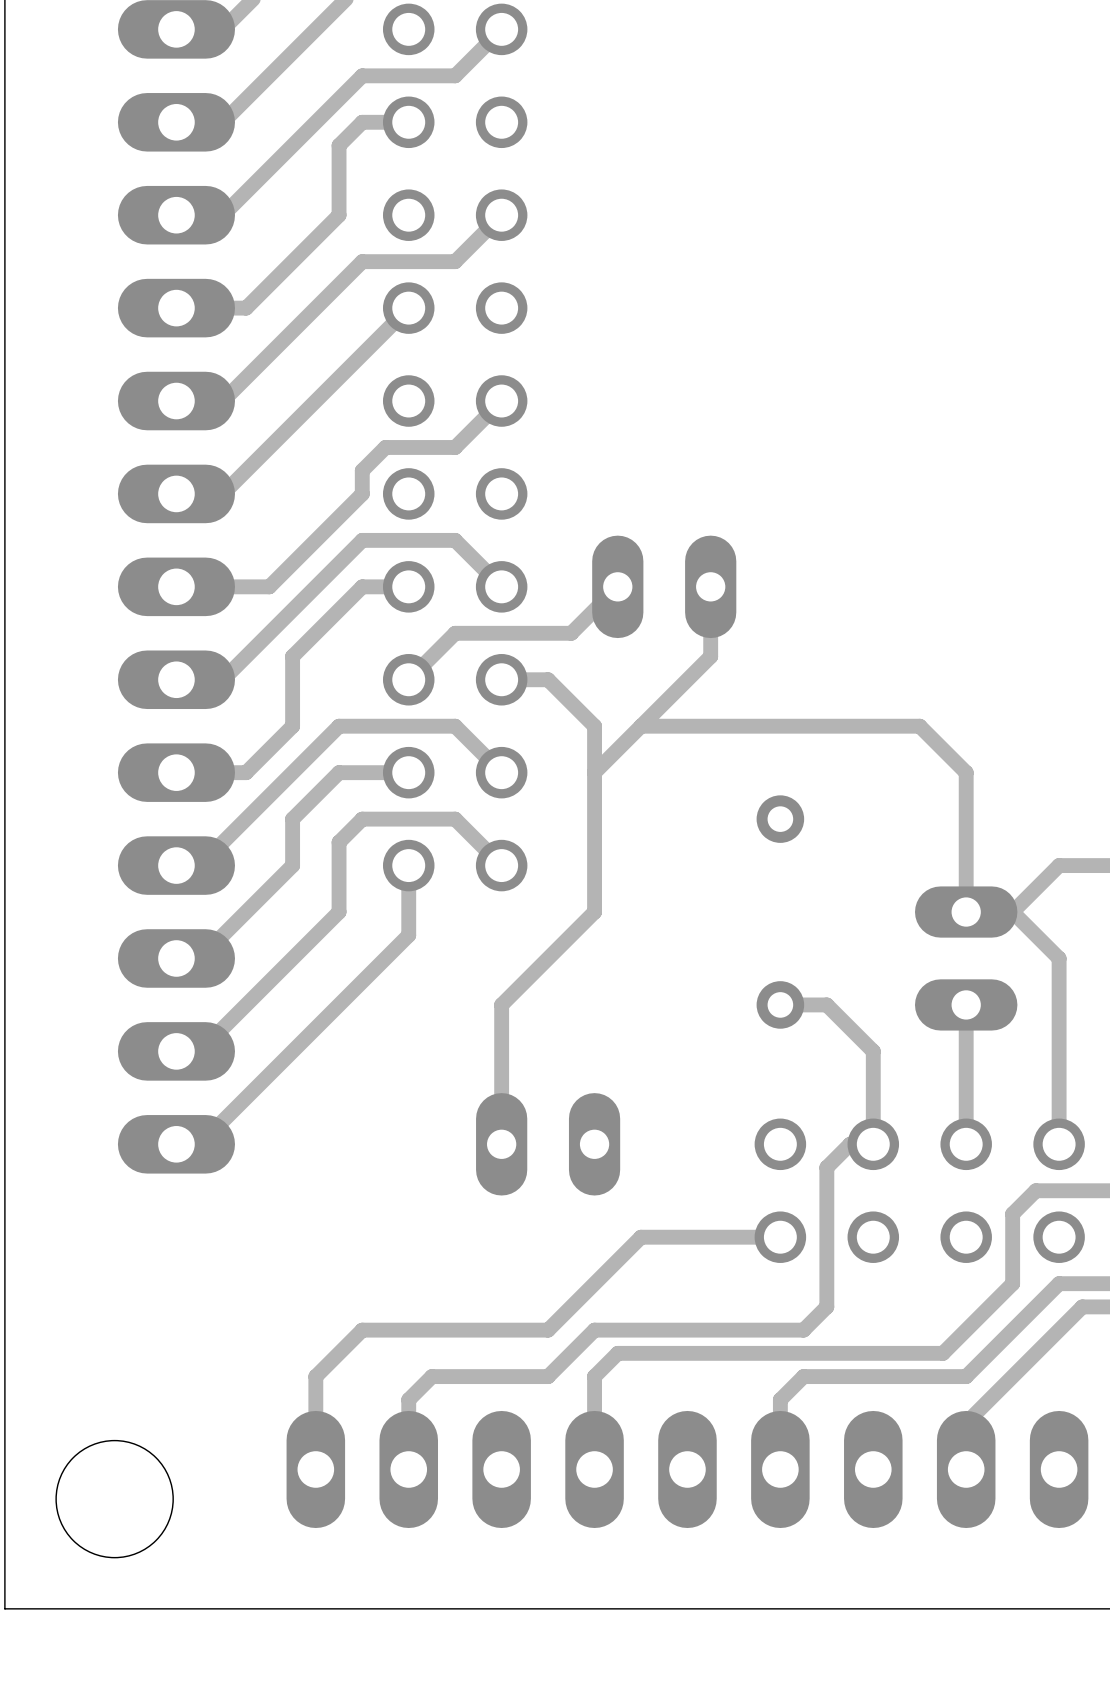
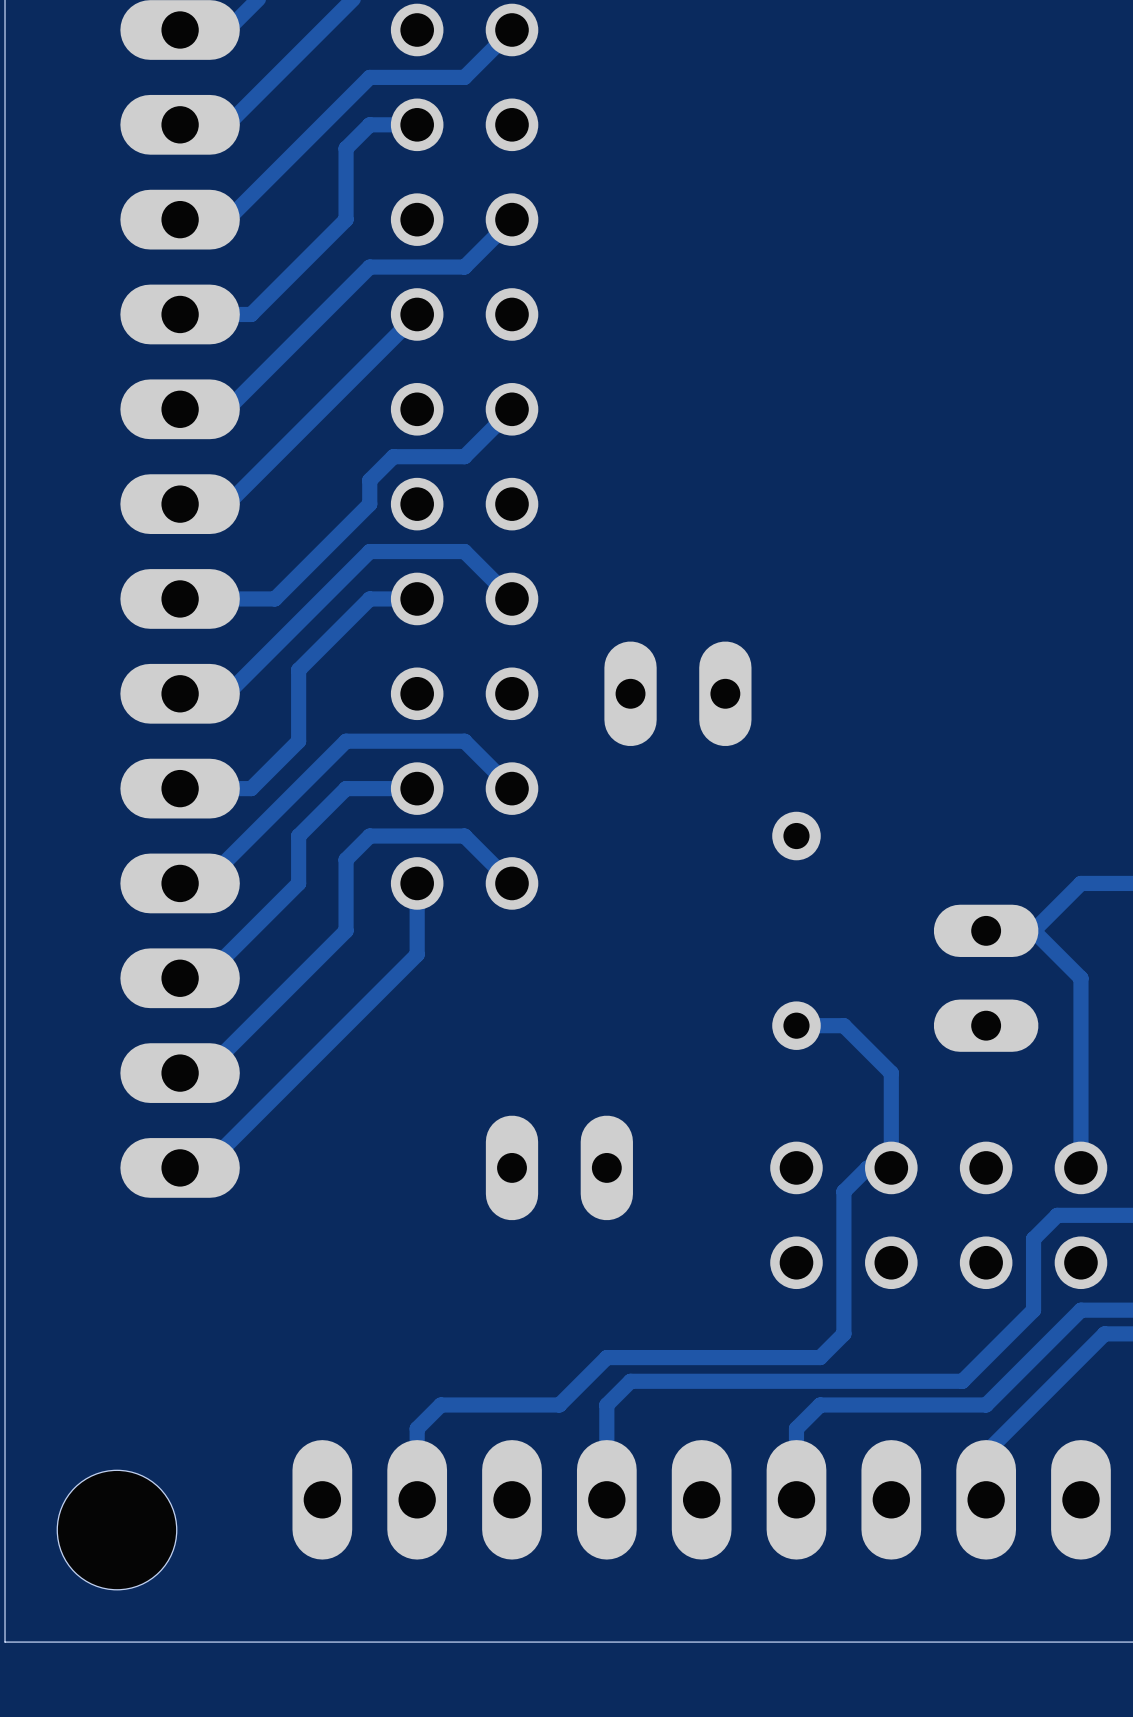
track: (617, 586) (571, 633) (455, 633) (408, 679) -> none
part position: (664, 586) -> (677, 693)
track: (710, 586) (710, 656) (594, 772) -> none
track: (501, 679) (548, 679) (594, 726) (594, 912) (501, 1004) (501, 1144) -> none
track: (641, 726) (919, 726) (966, 772) (966, 912) -> none
track: (966, 1004) (966, 1144) -> none
track: (780, 1237) (641, 1237) (548, 1330) (362, 1330) (315, 1376) (315, 1469) -> none

